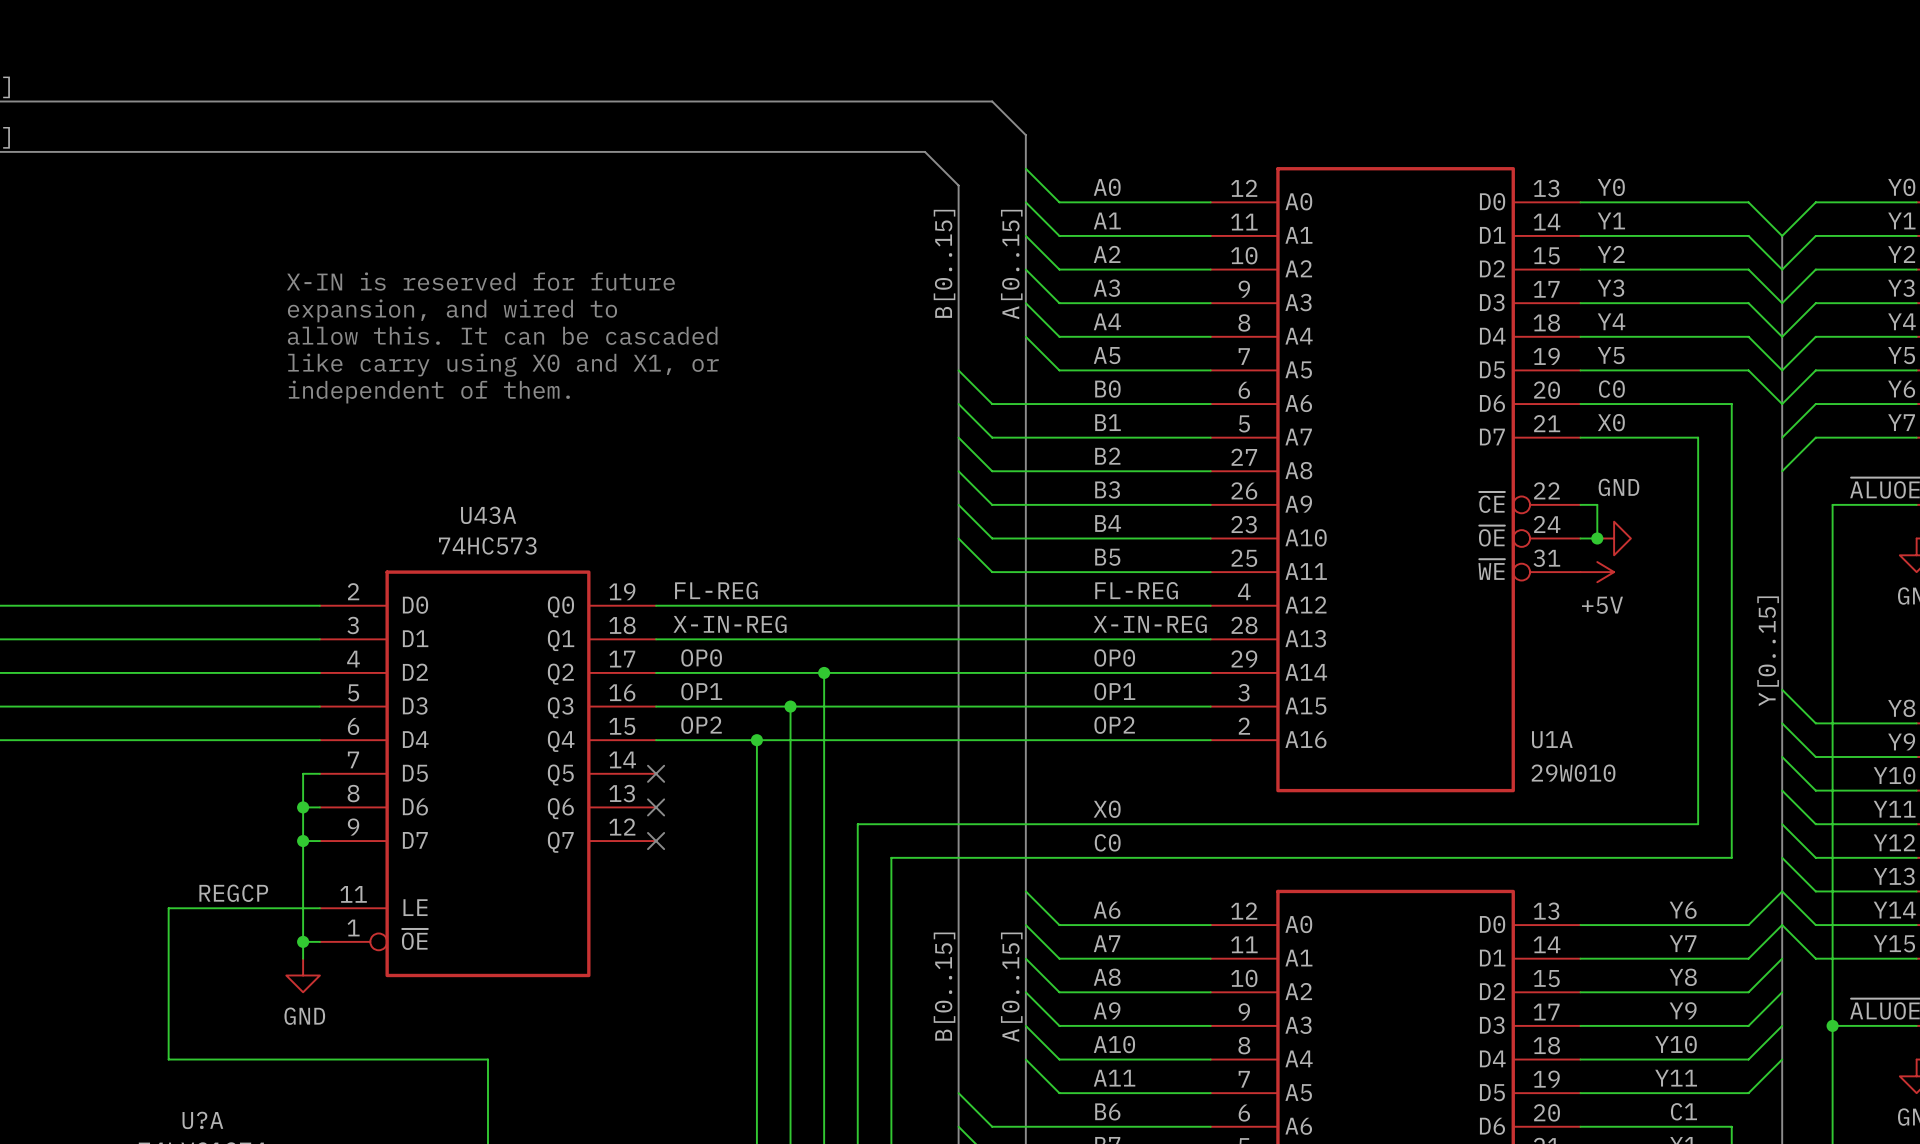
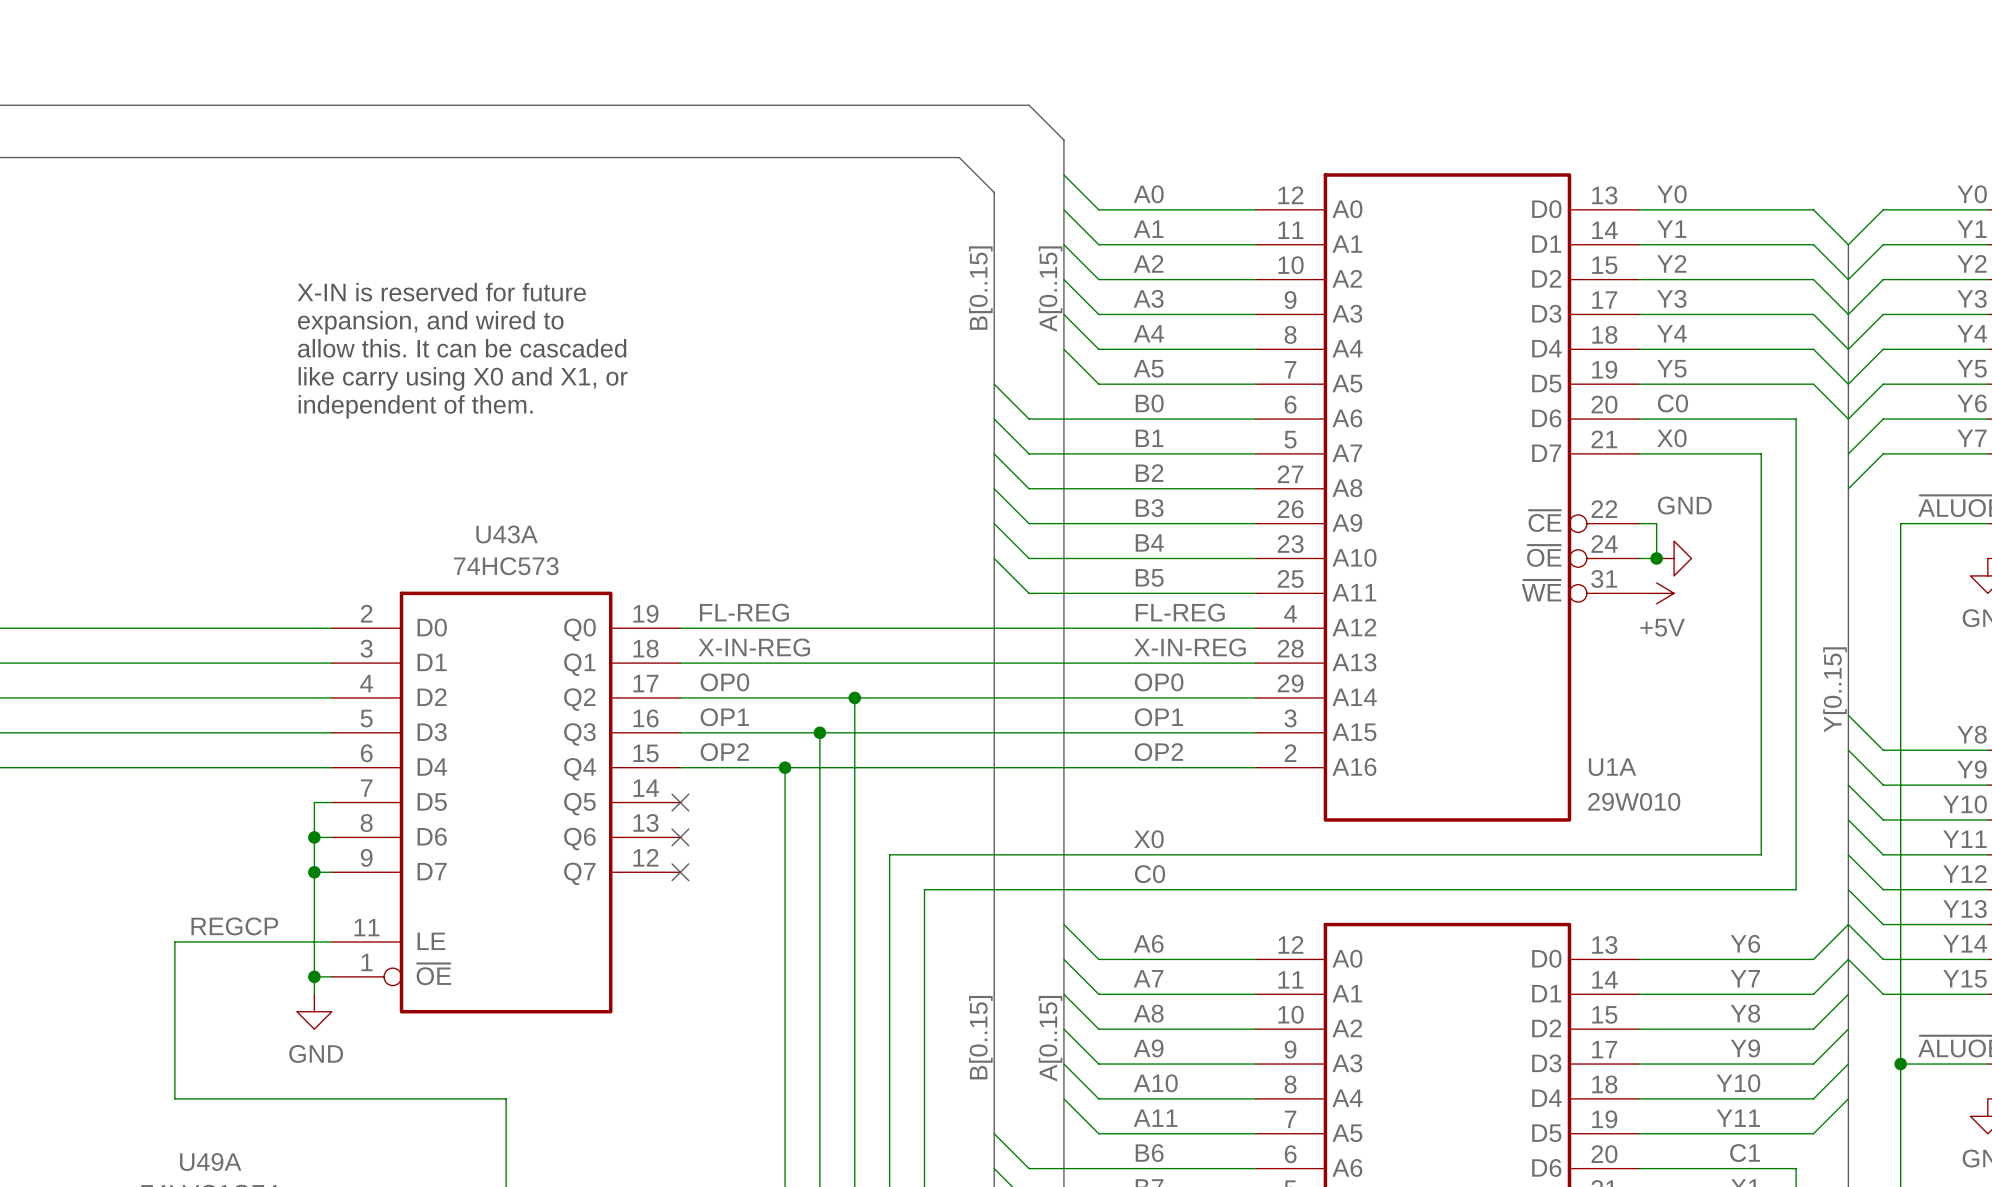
U?A name: U?A (202, 1120) -> U49A (210, 1162)

